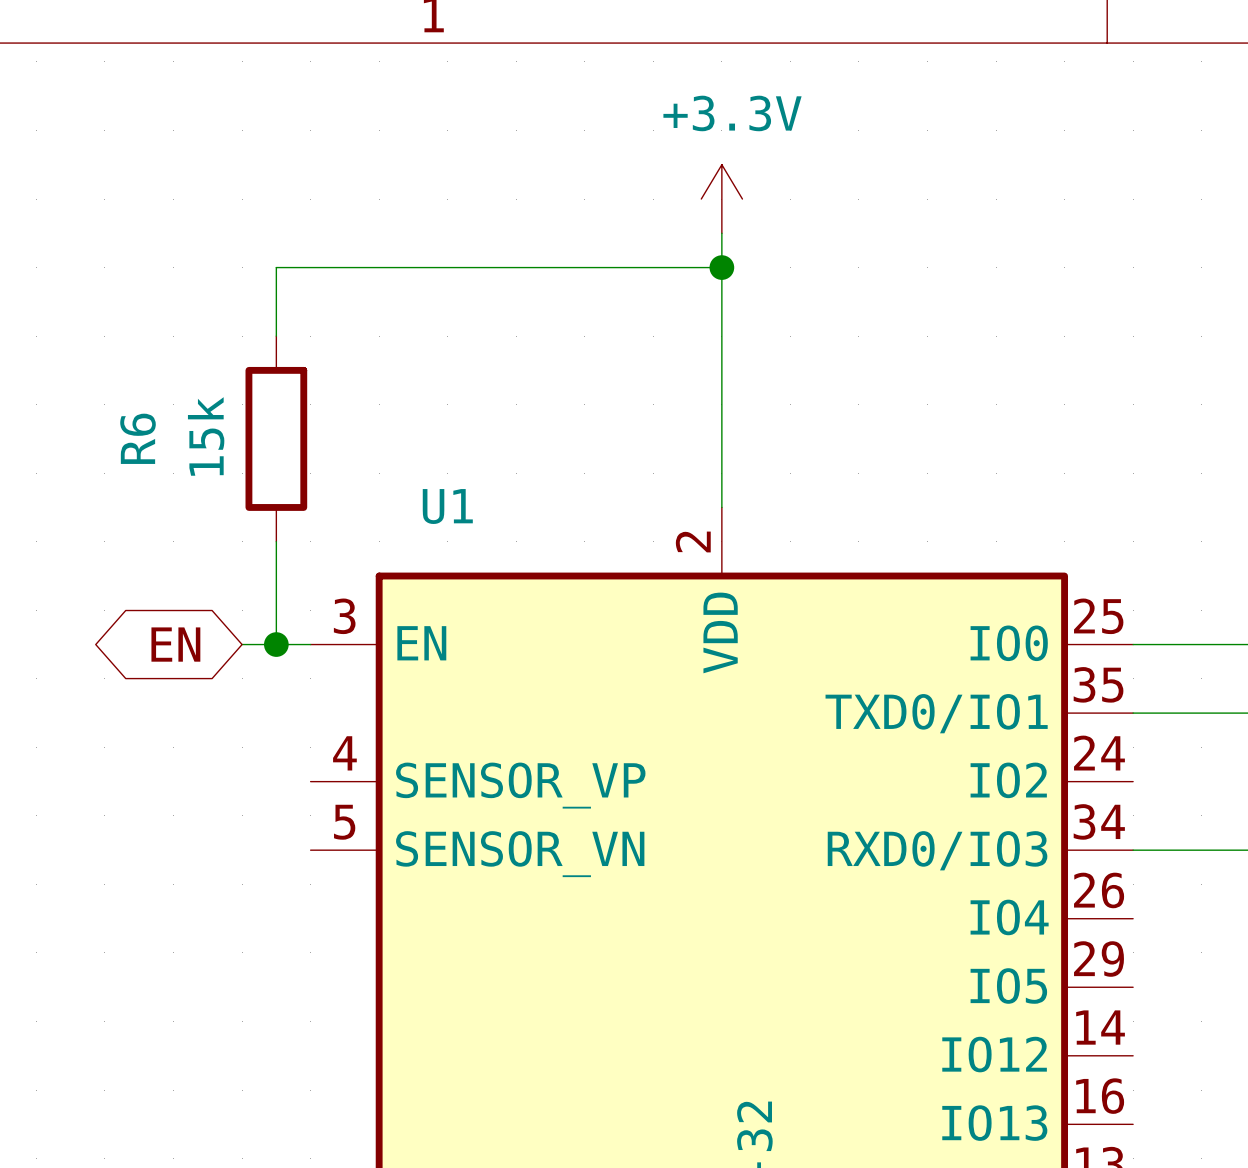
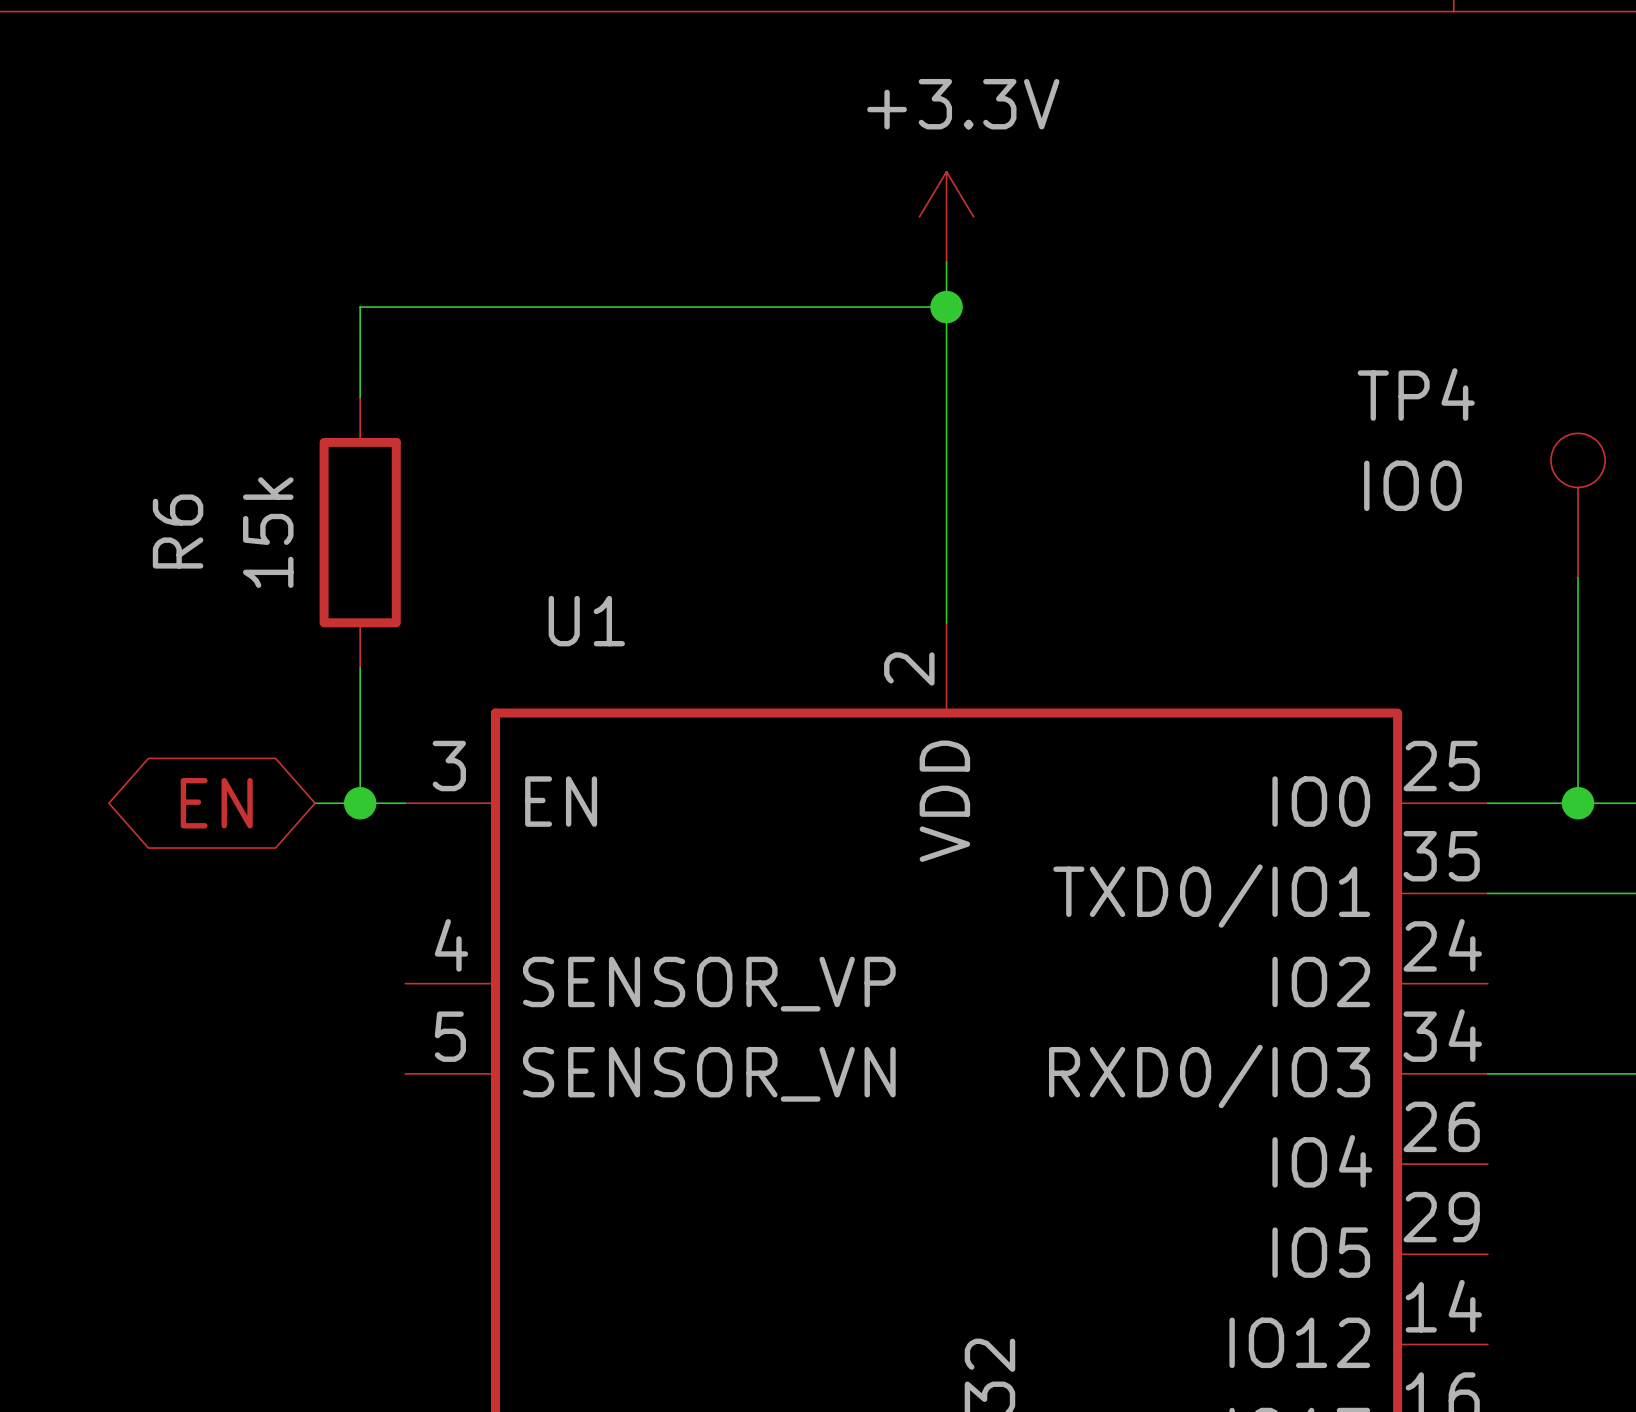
TP4: none -> IO0 (1578, 505)
wire: none -> (1578, 577) (1578, 803)
junction: none -> (1578, 803)

